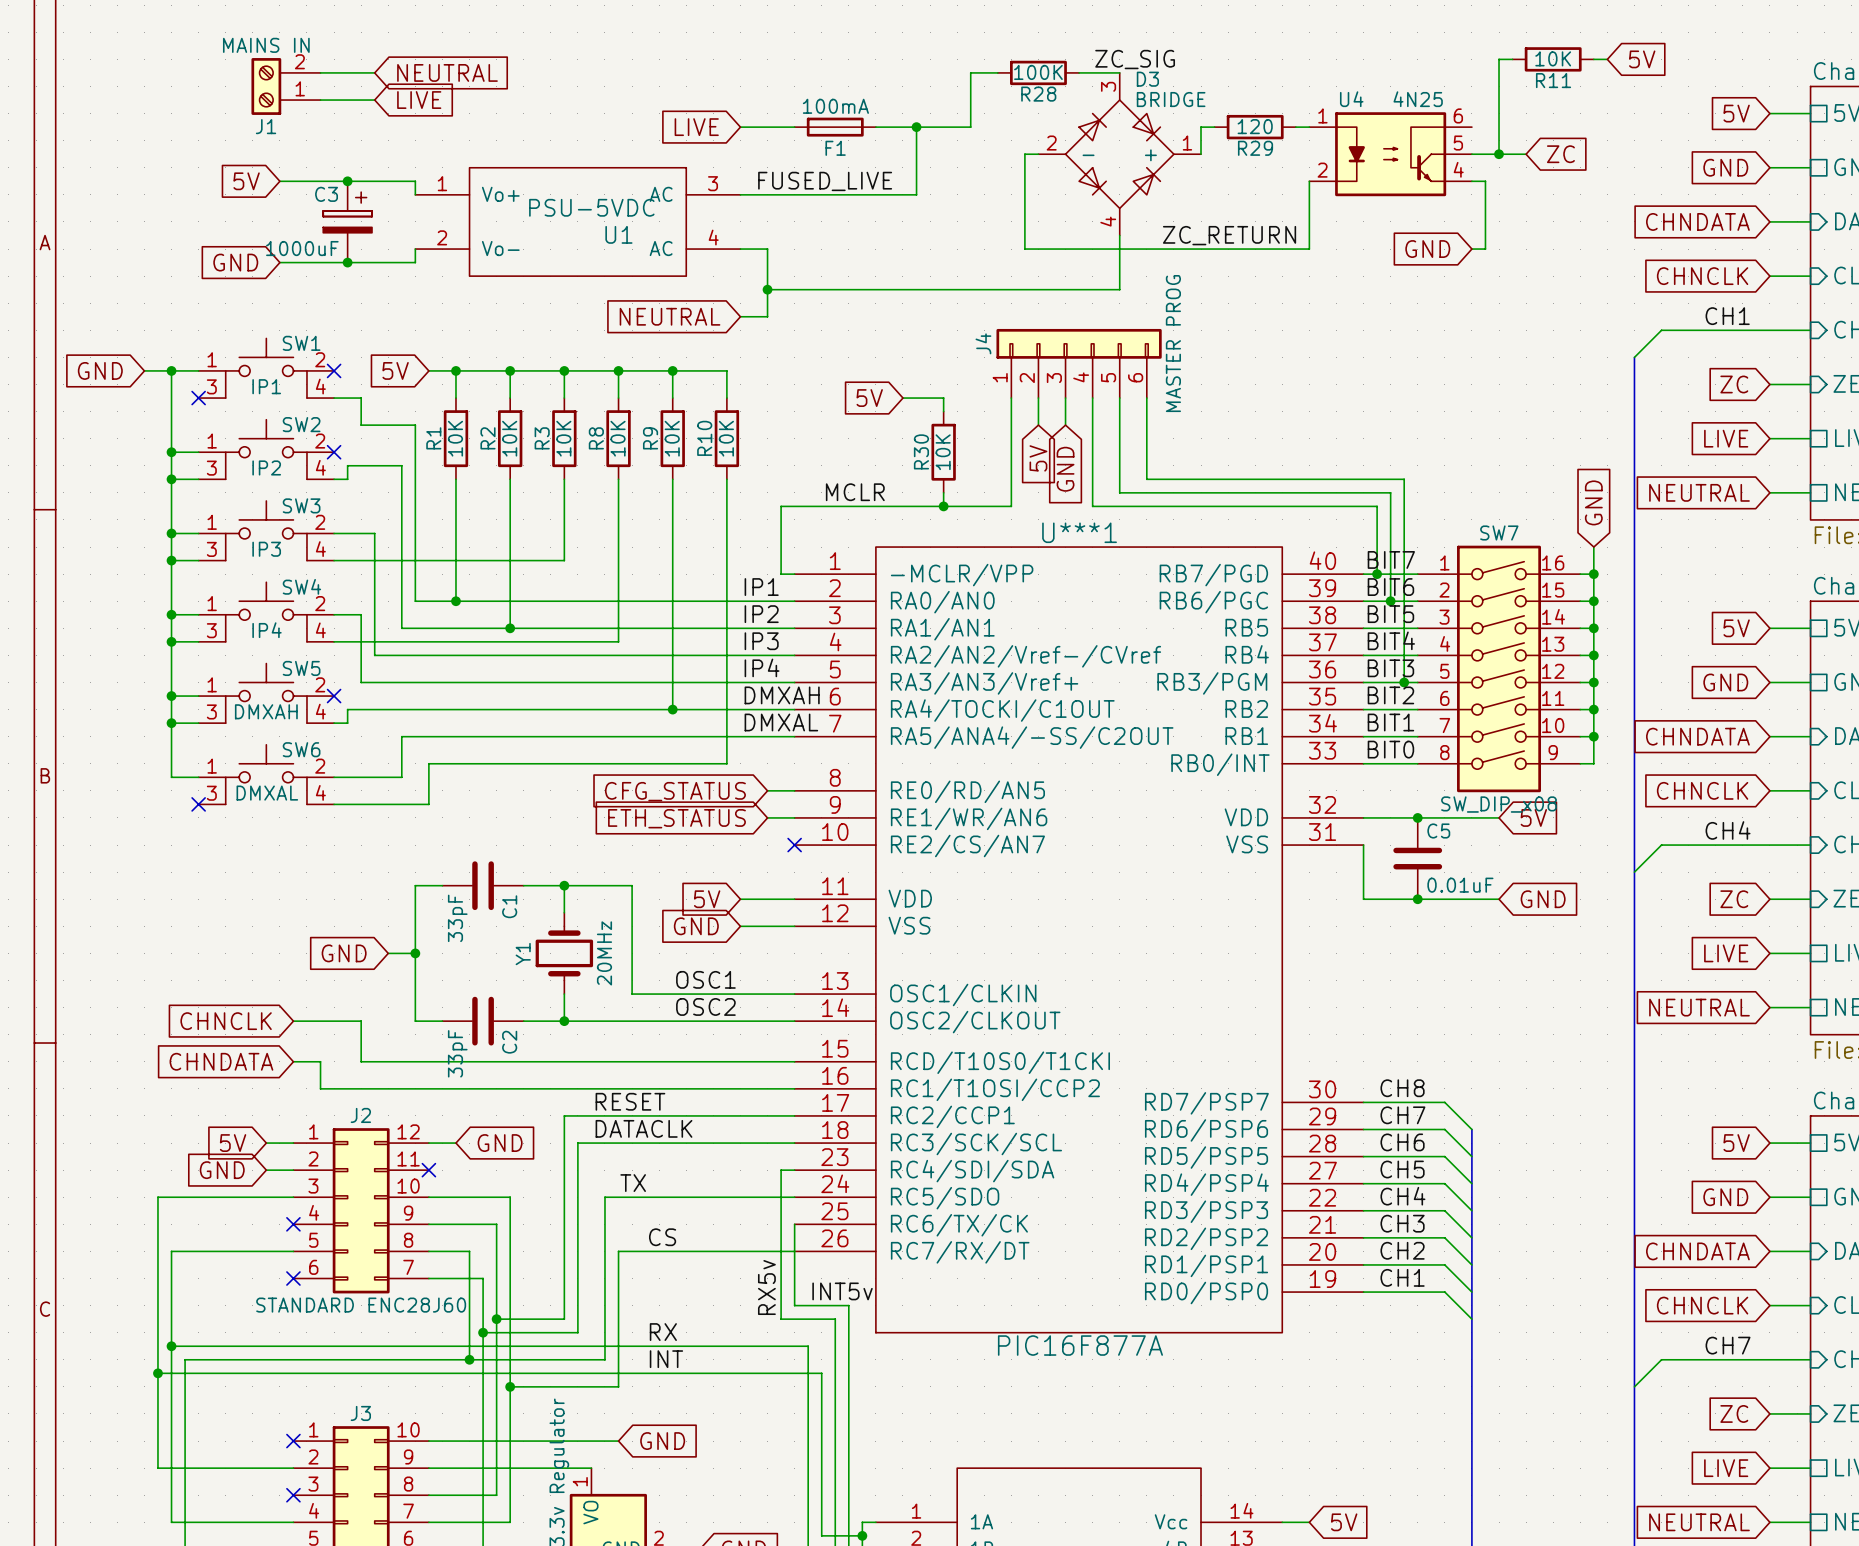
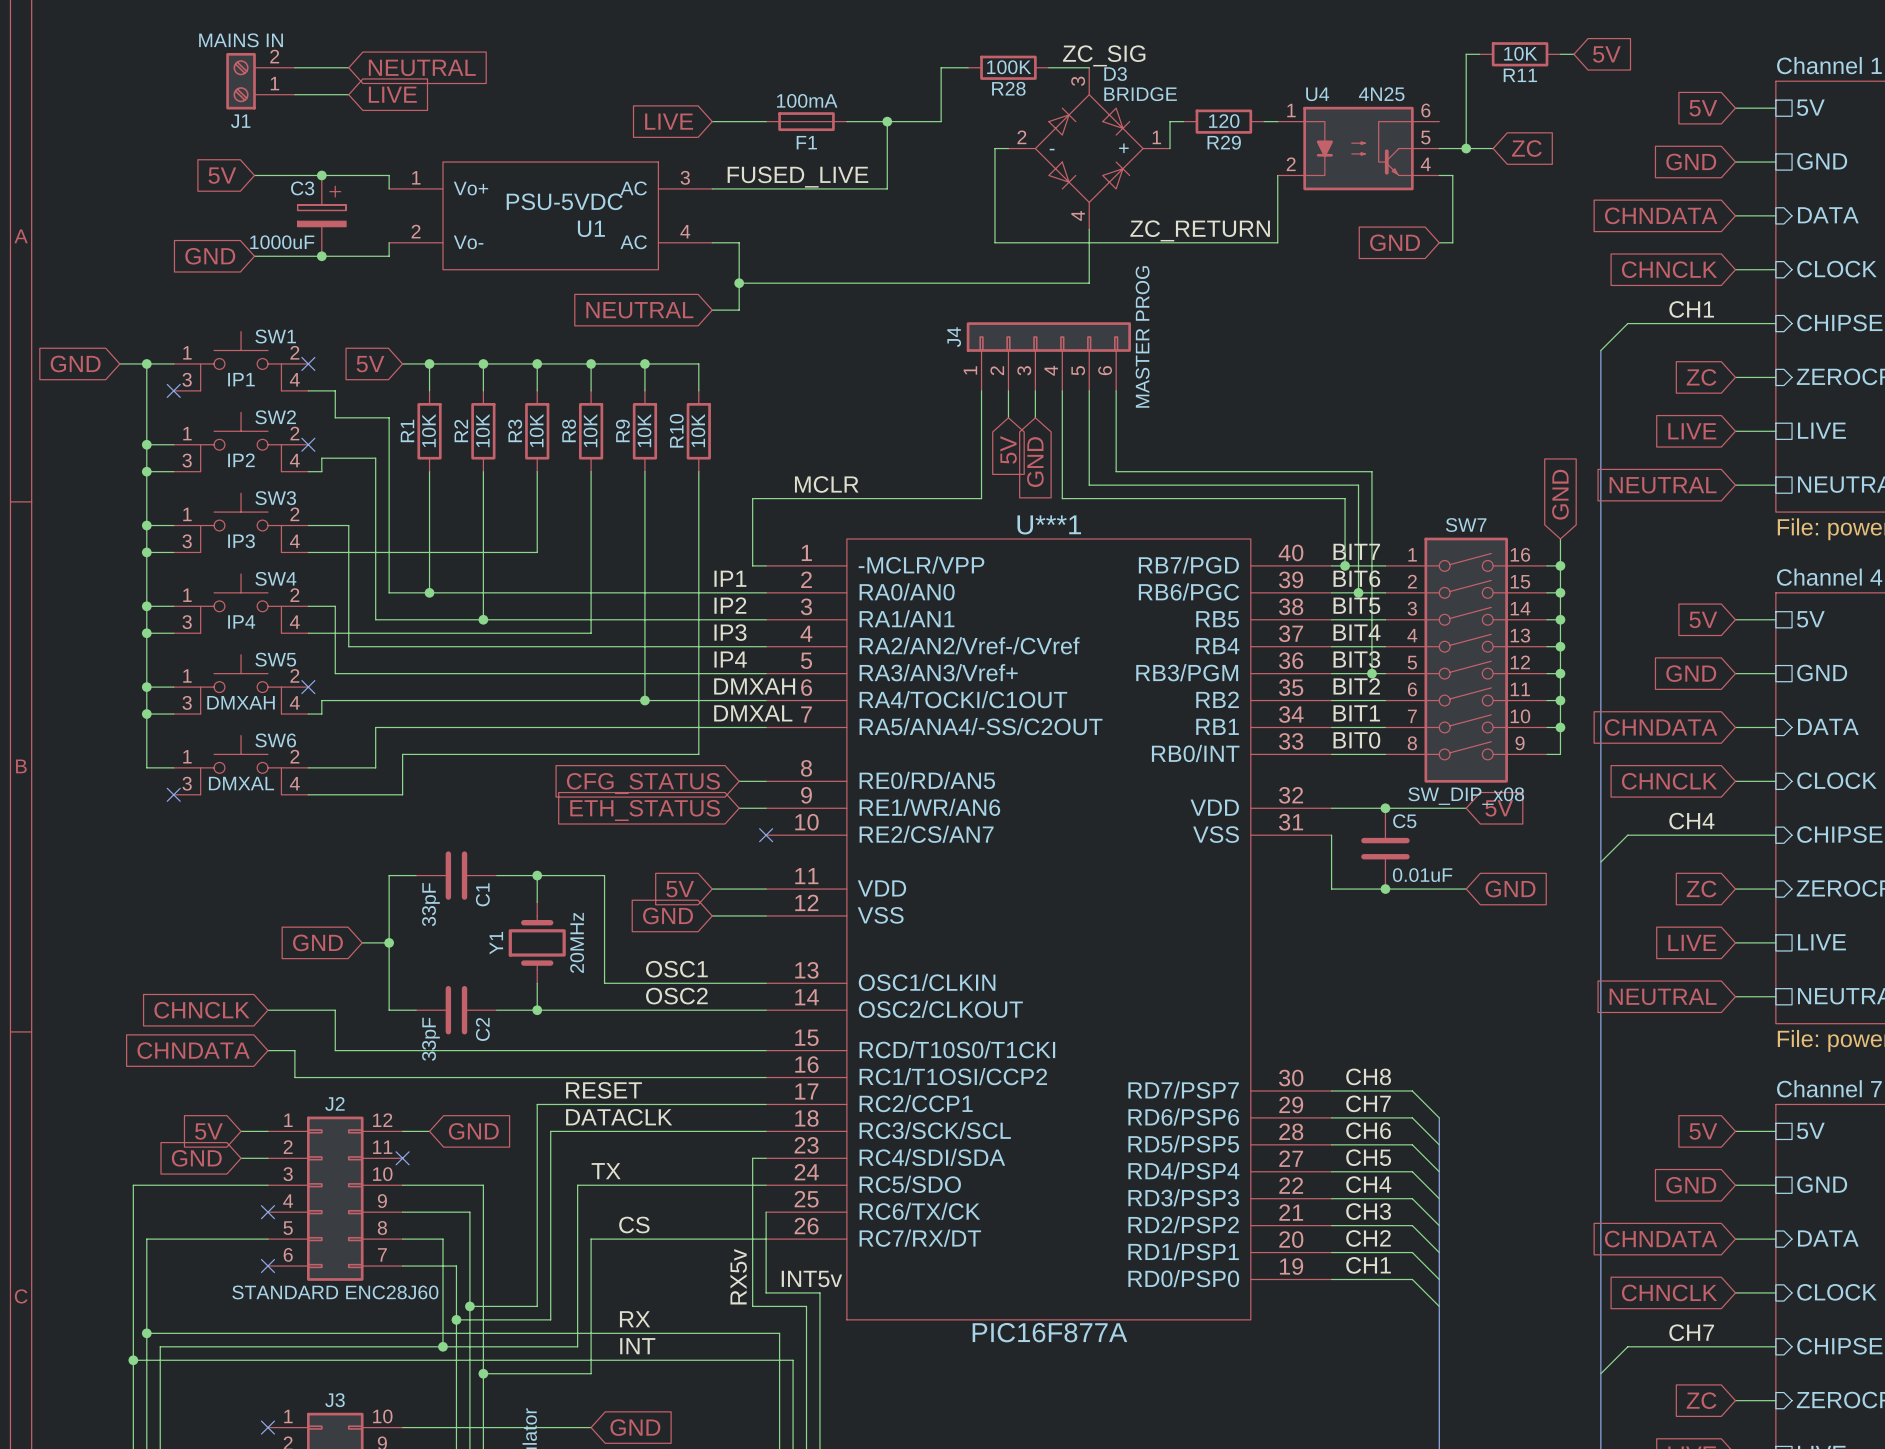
global label: 5V (869, 398) -> none
wire: (902, 398) (943, 398) (943, 411) -> none
R30: 10K (943, 452) -> none
wire: (943, 492) (943, 506) -> none
junction: (943, 506) -> none

